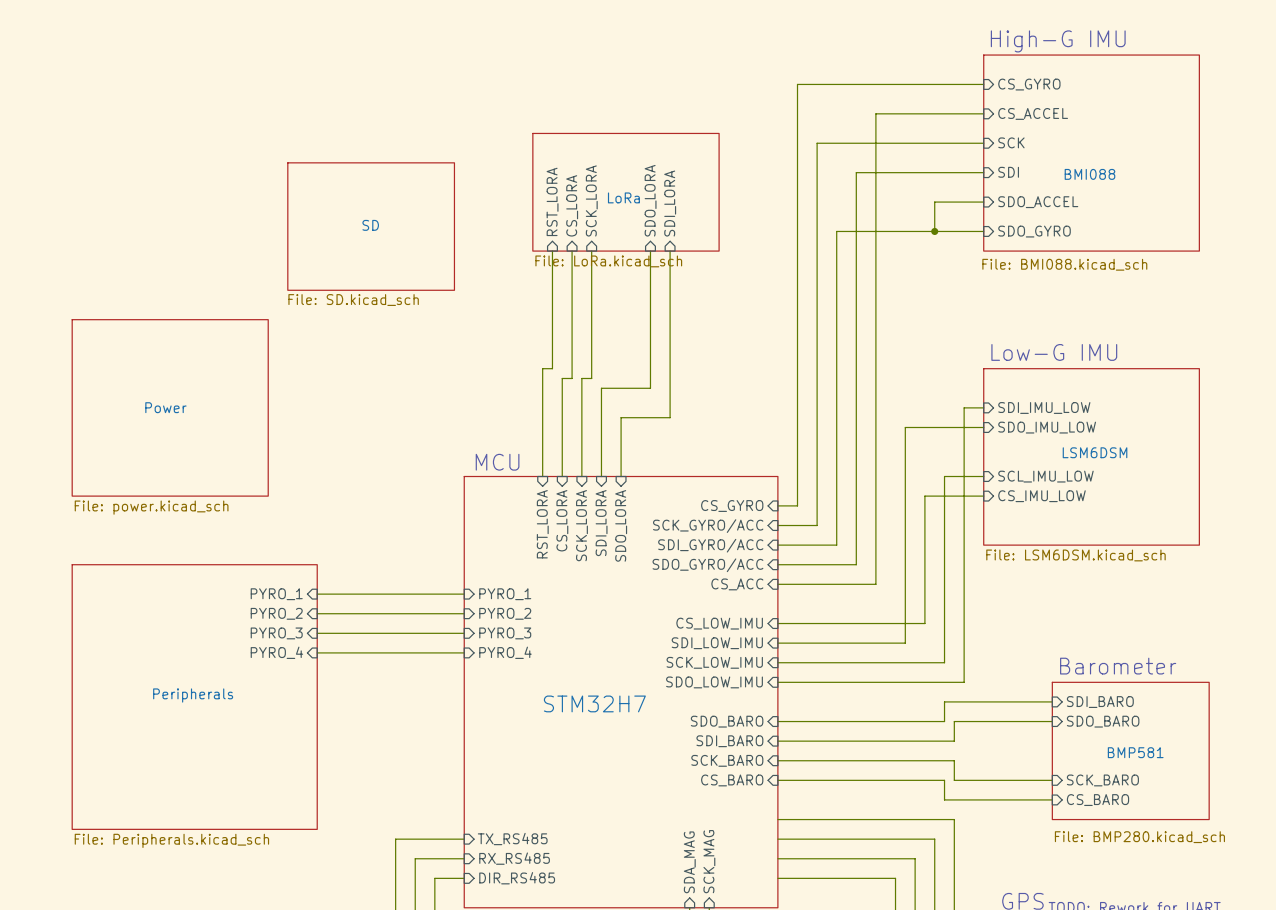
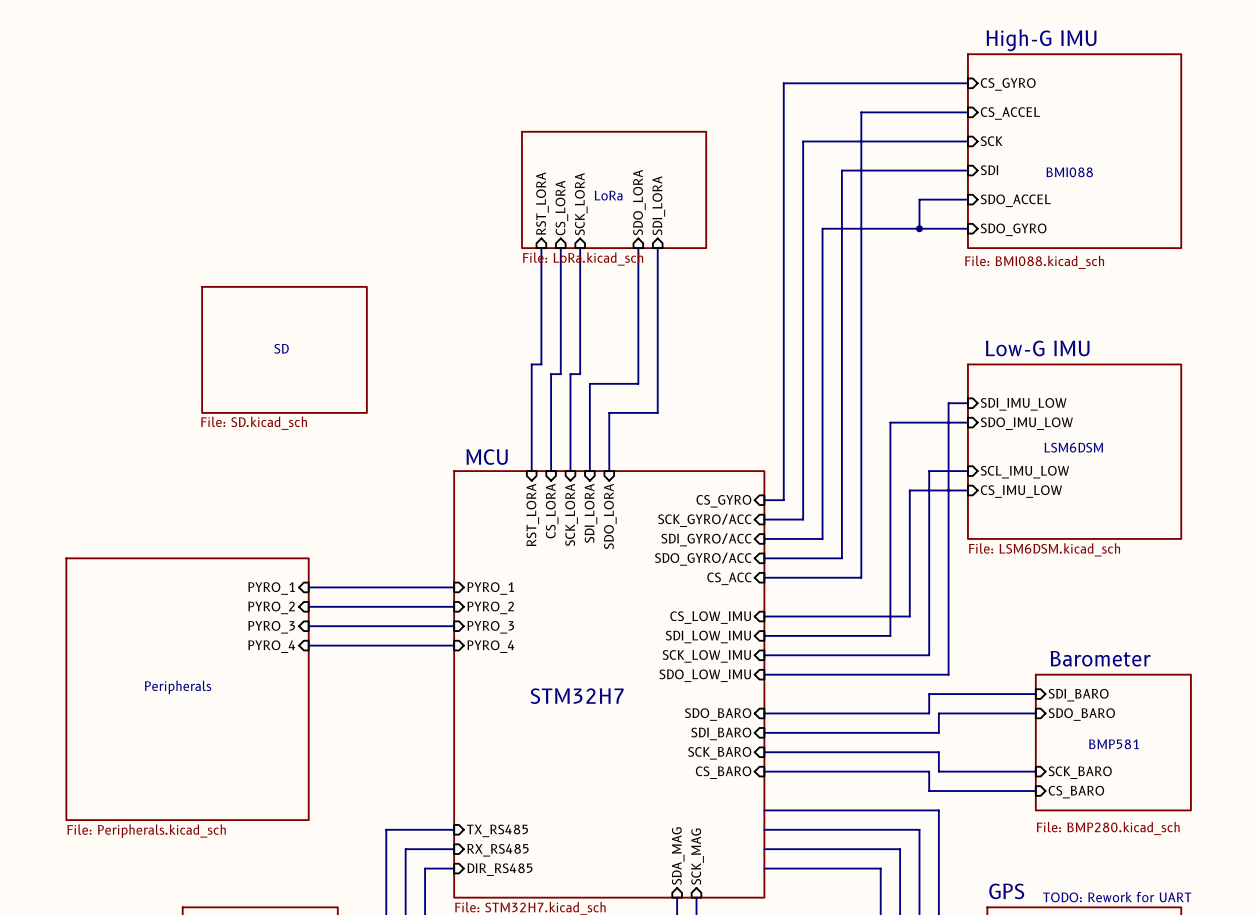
sheet SD position: (371, 226) -> (284, 349)
sheet Power: File: power.kicad_sch (170, 407) -> none

